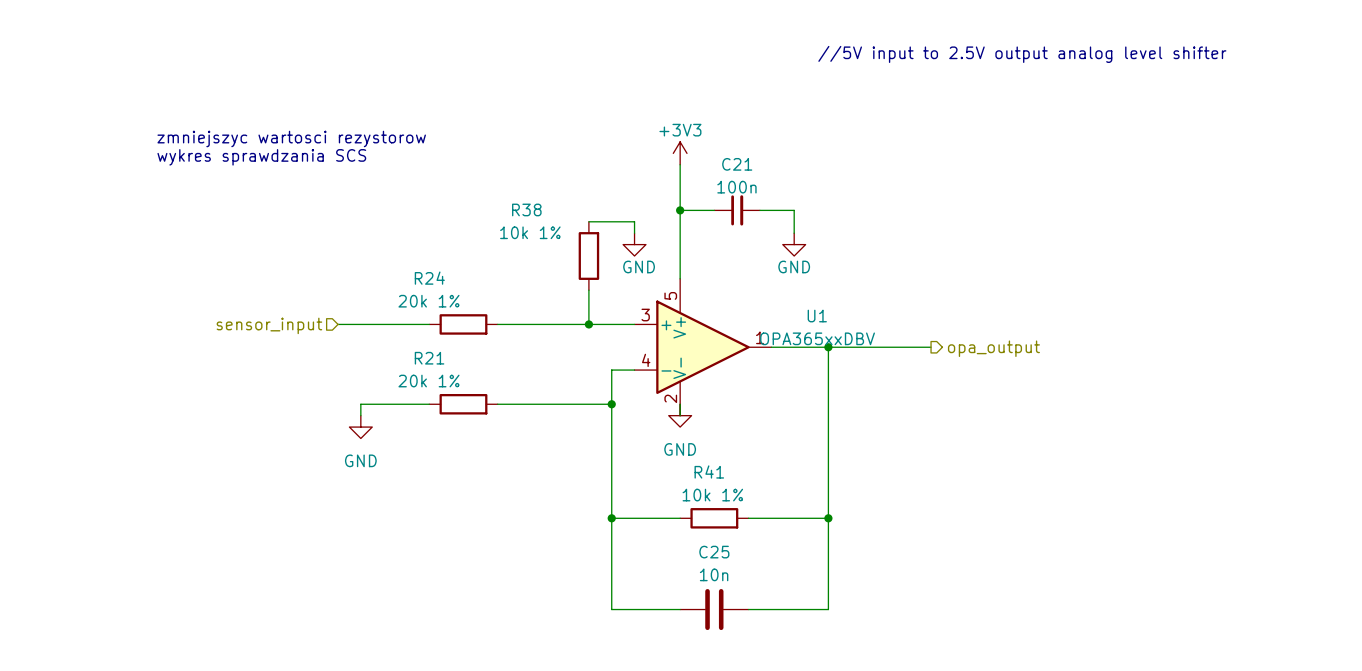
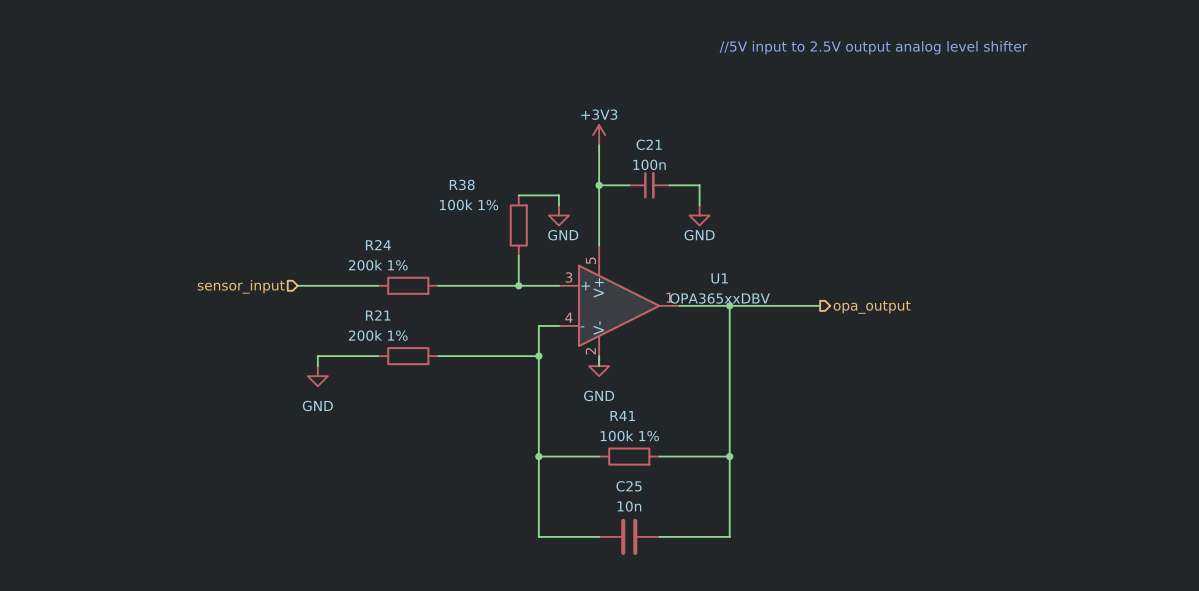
text: zmniejszyc wartosci rezystorow (291, 138) -> none
text: wykres sprawdzania SCS (261, 157) -> none
R38 value: 10k 1% (530, 232) -> 100k 1% (469, 204)
R24 value: 20k 1% (428, 301) -> 200k 1% (378, 265)
R21 value: 20k 1% (428, 381) -> 200k 1% (378, 335)
R41 value: 10k 1% (712, 495) -> 100k 1% (629, 435)

